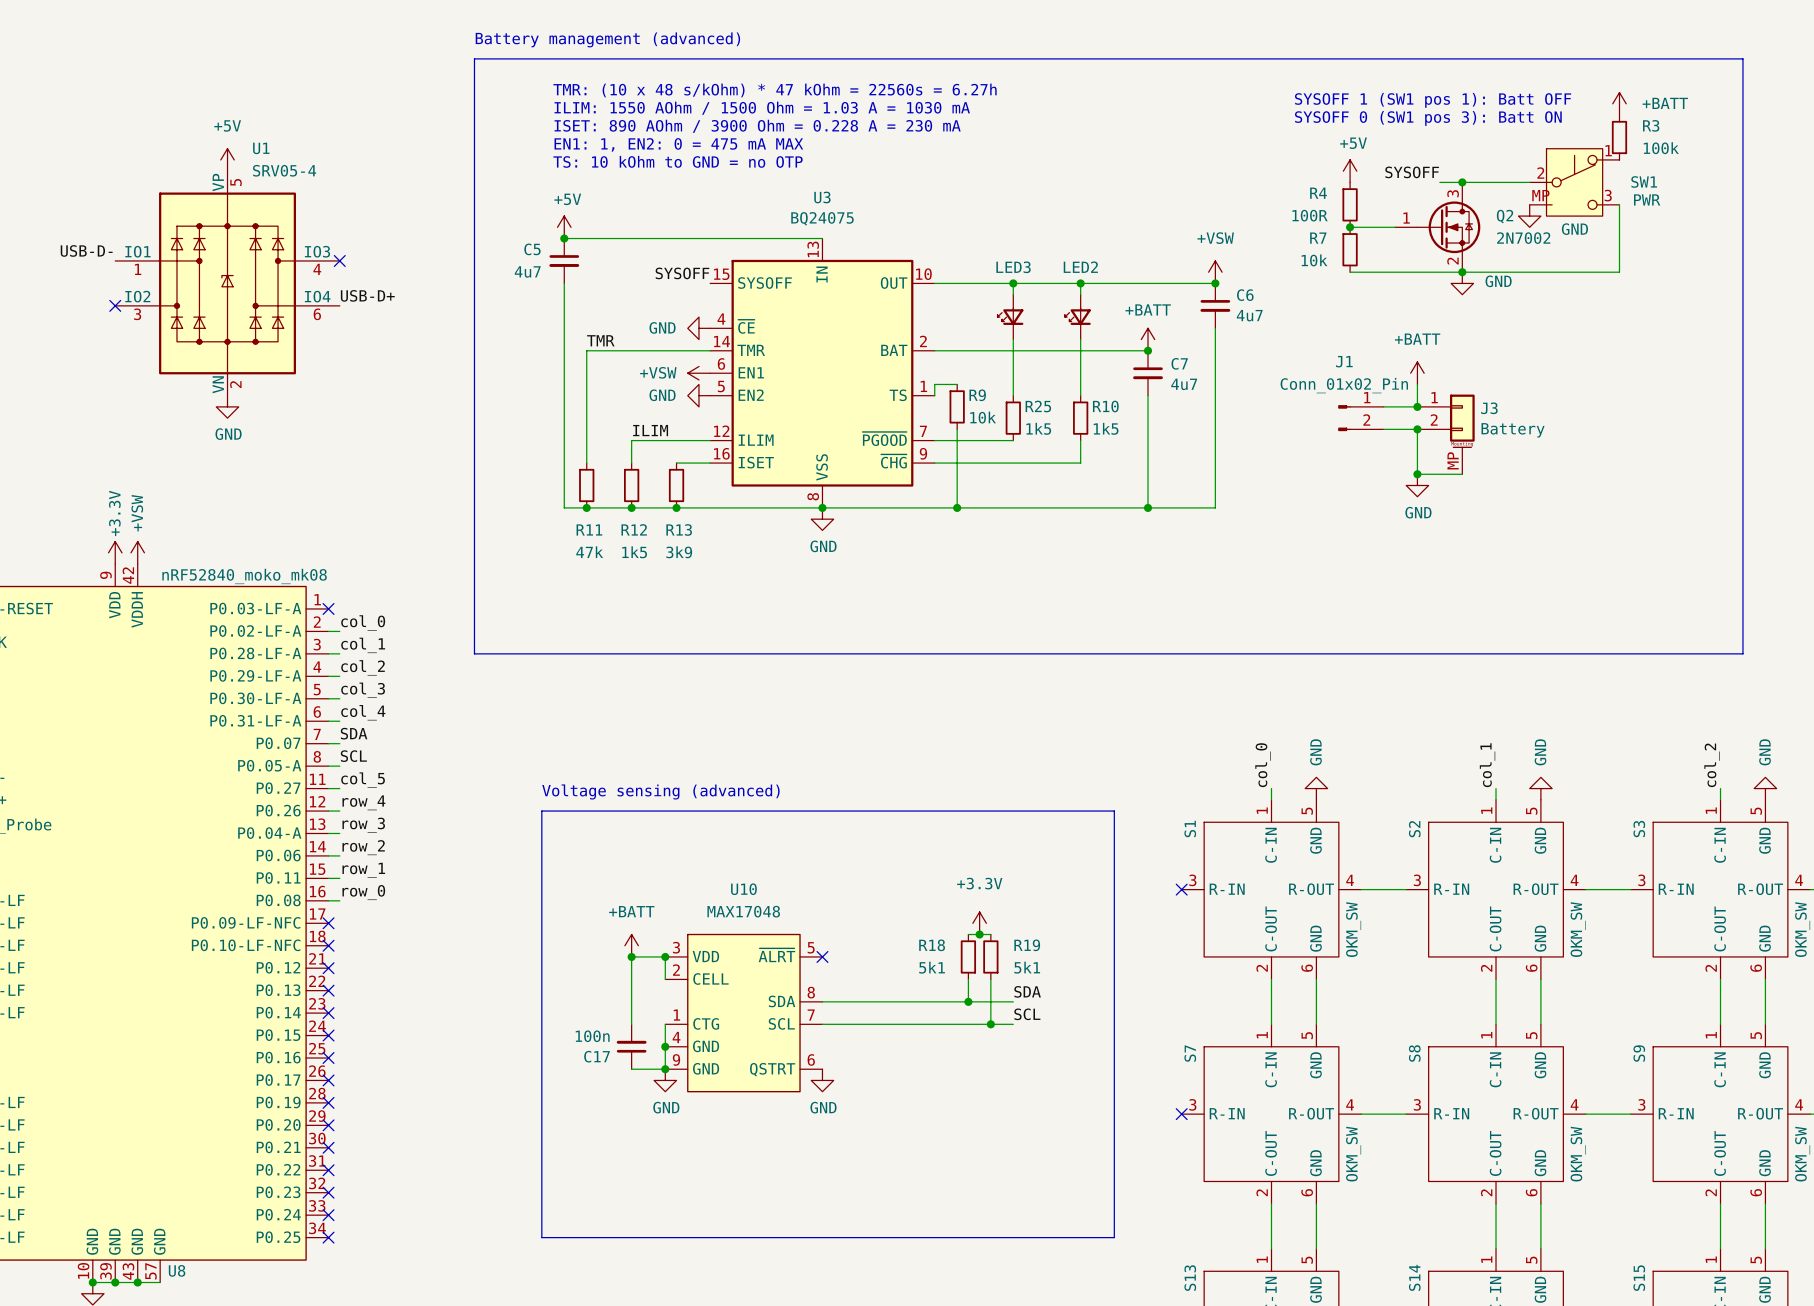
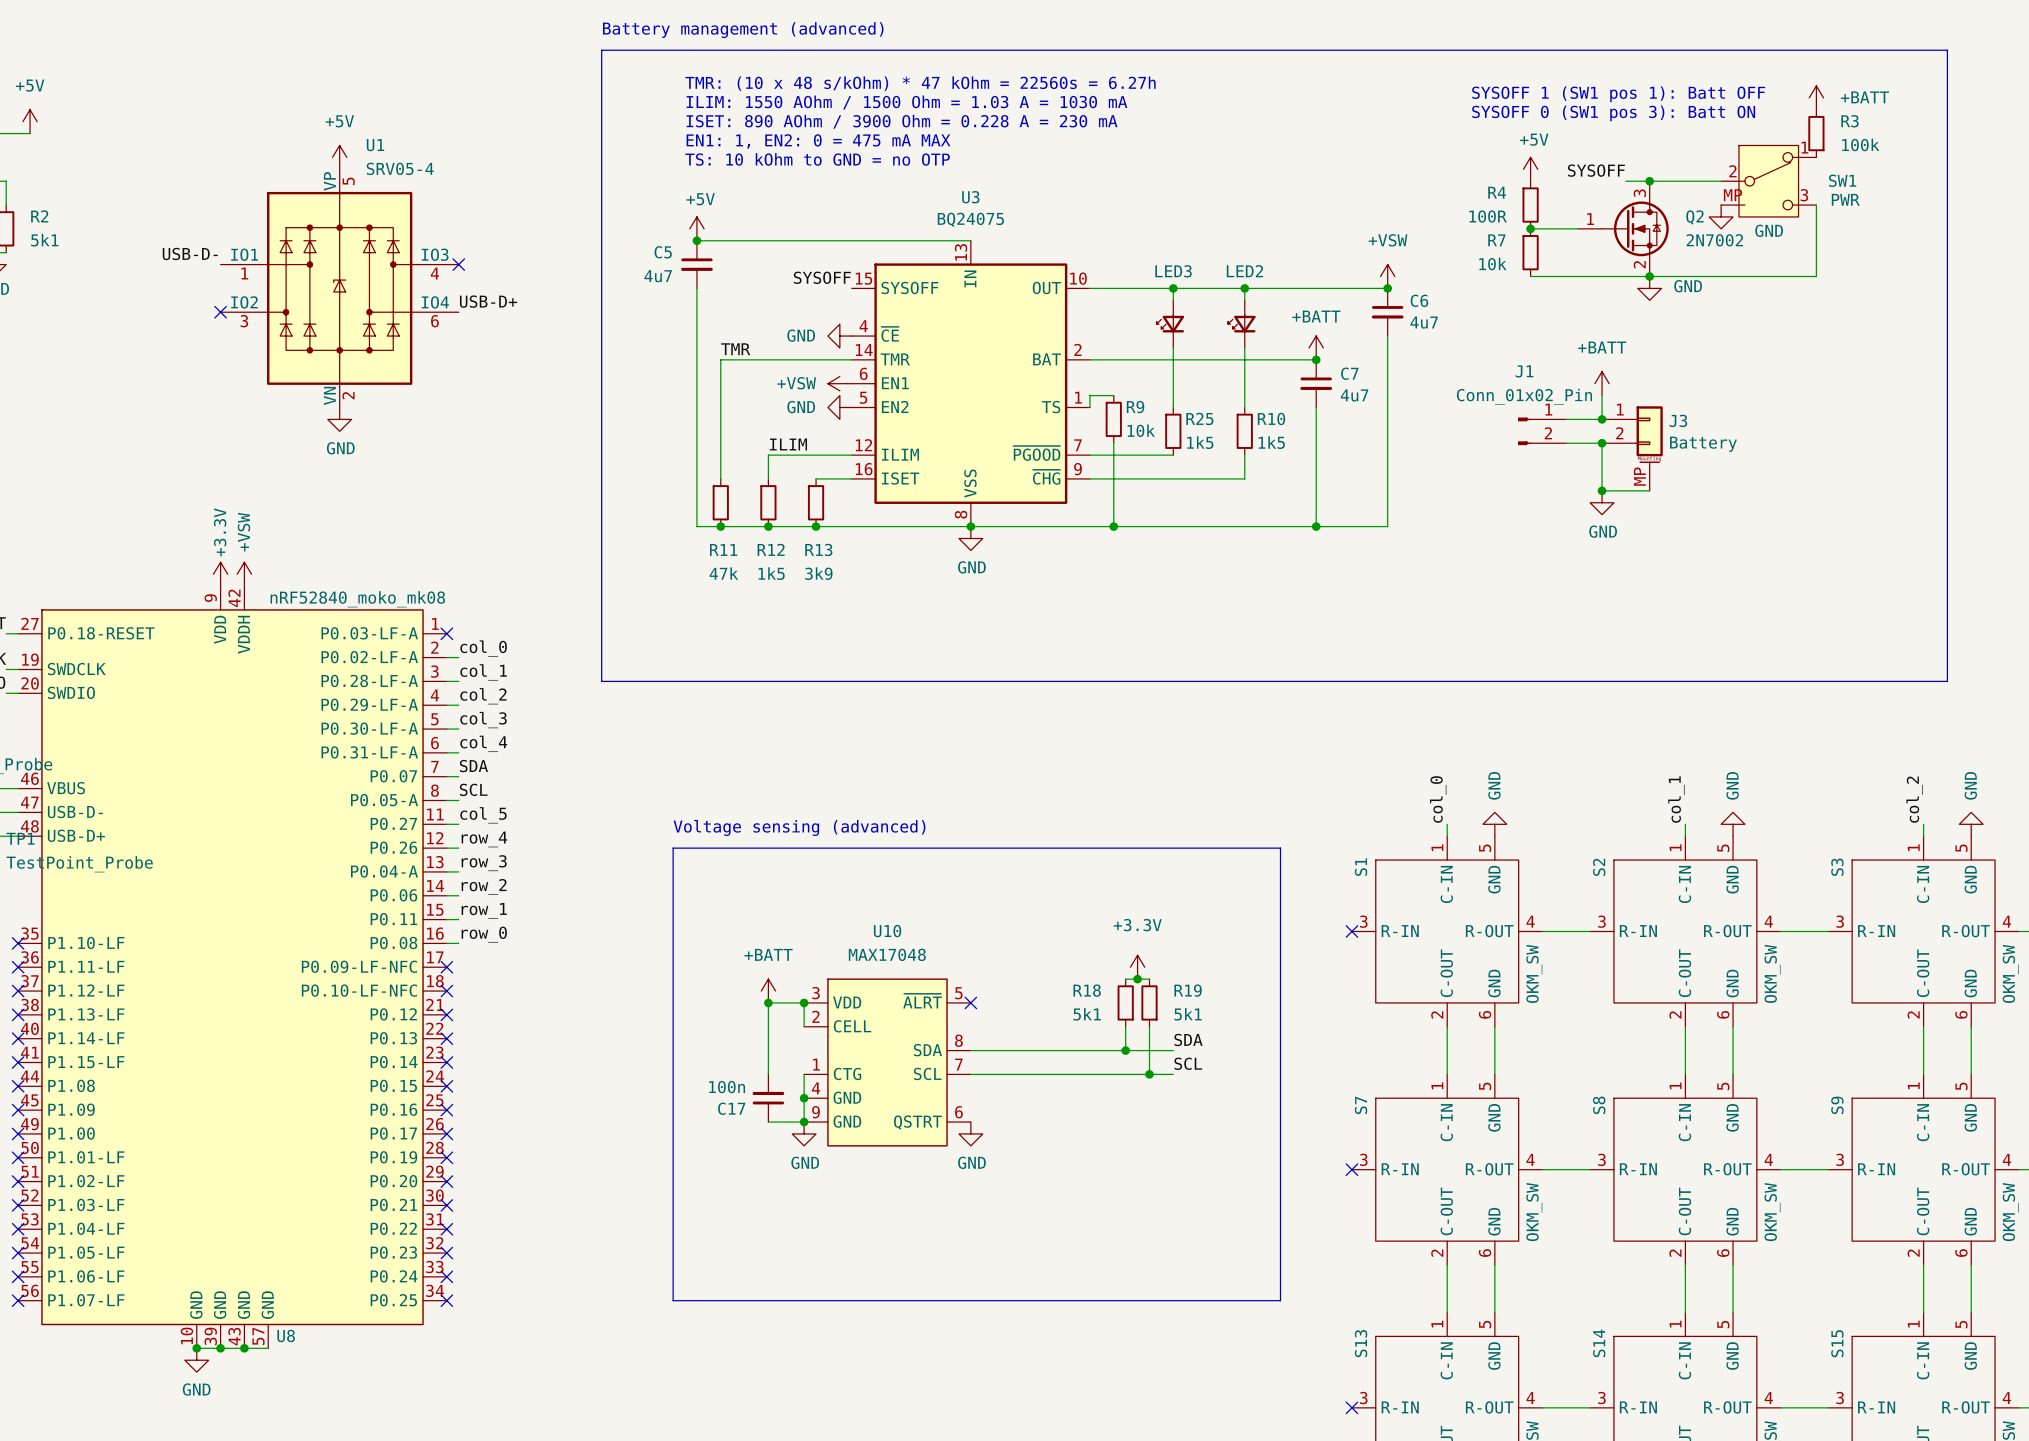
SW1 symbol: [1529, 148, 1620, 217] -> [1721, 145, 1817, 217]

